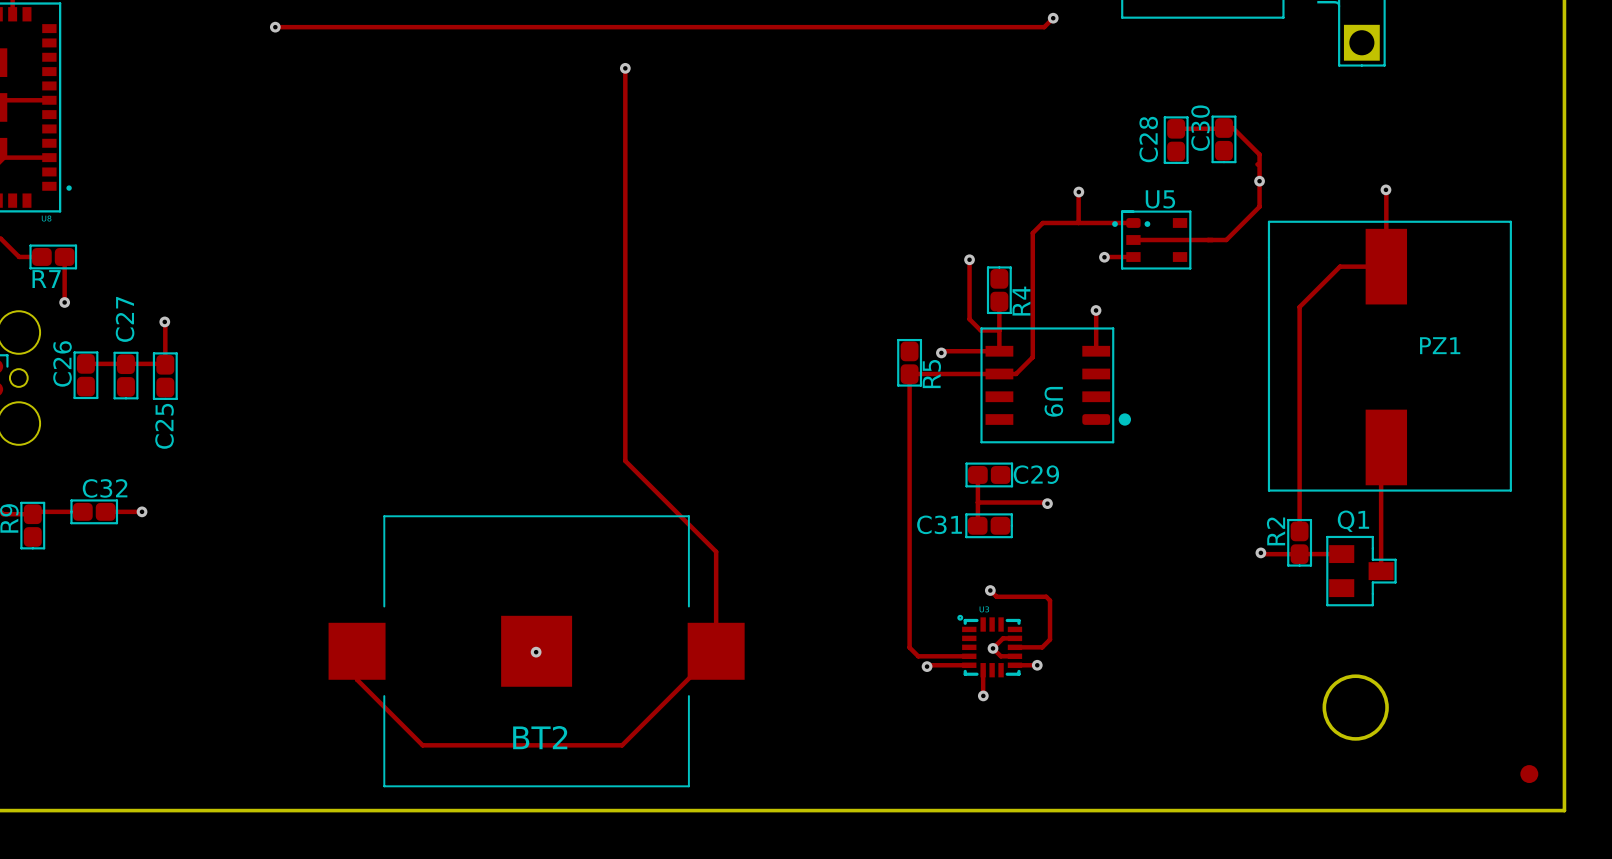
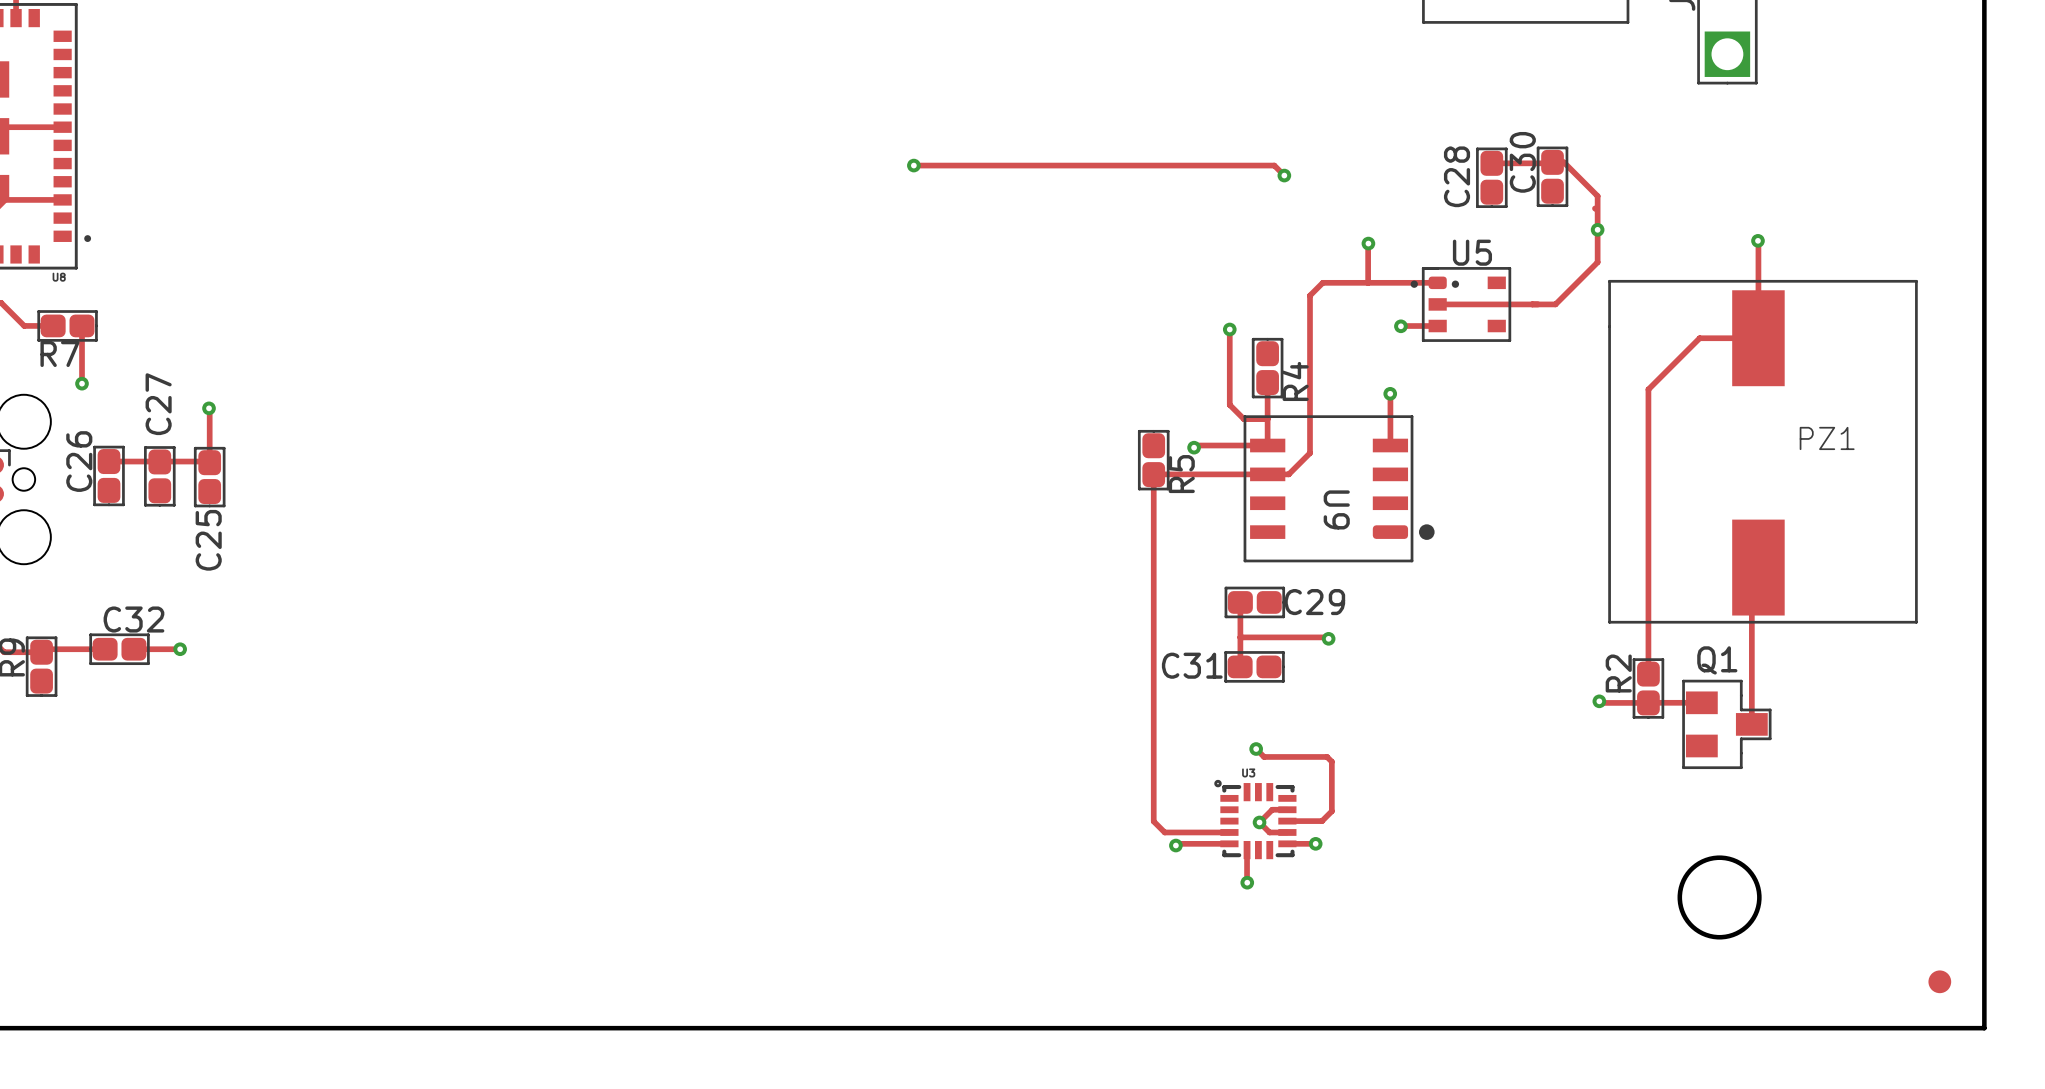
track: (1053, 18) (1044, 27) (275, 27) -> none
via: (1053, 18) -> none
via: (275, 27) -> none
track: (625, 68) (625, 460) (716, 551) (716, 651) (622, 745) (422, 745) (357, 679) (357, 651) -> none
via: (625, 68) -> none
track: none -> (913, 165) (1274, 165) (1284, 175)
via: none -> (913, 165)
via: none -> (1284, 175)
BT2: (536, 651) -> none
via: (536, 652) -> none

